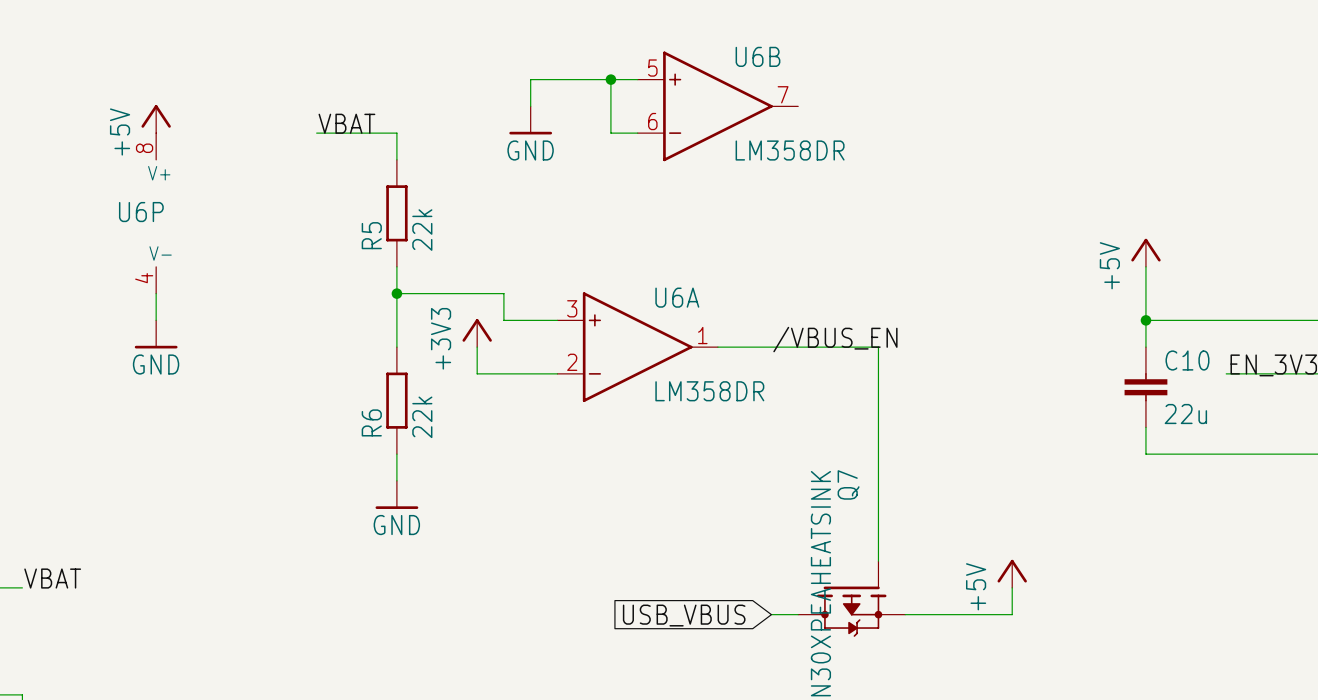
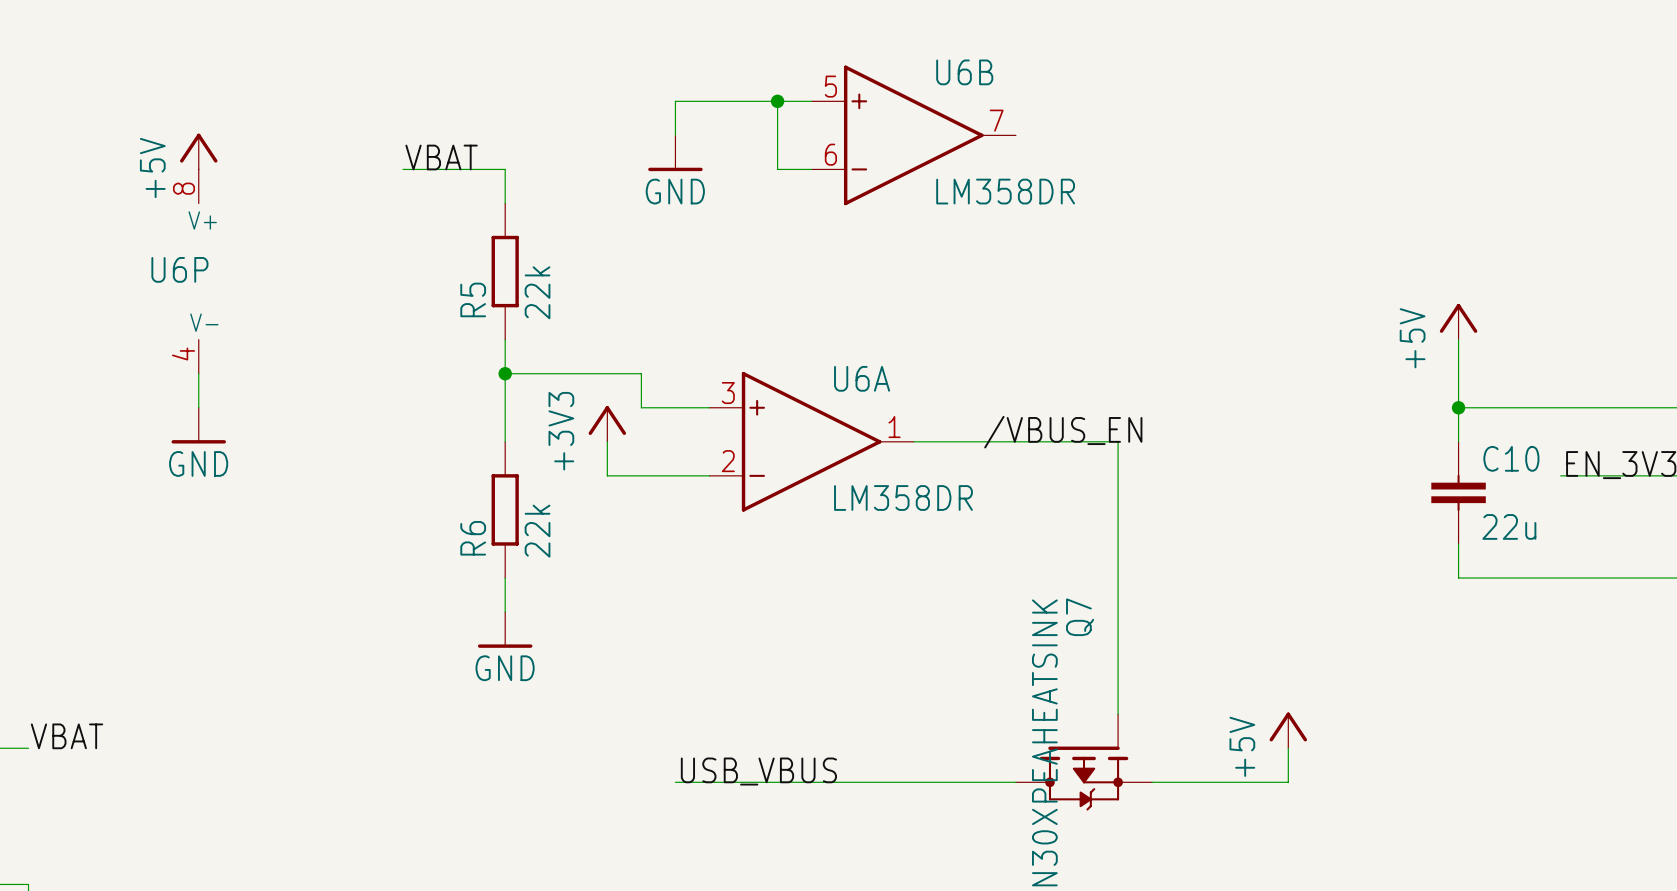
label: none -> USB_VBUS (758, 771)
wire: none -> (675, 782) (981, 782)
global label: USB_VBUS (684, 615) -> none

